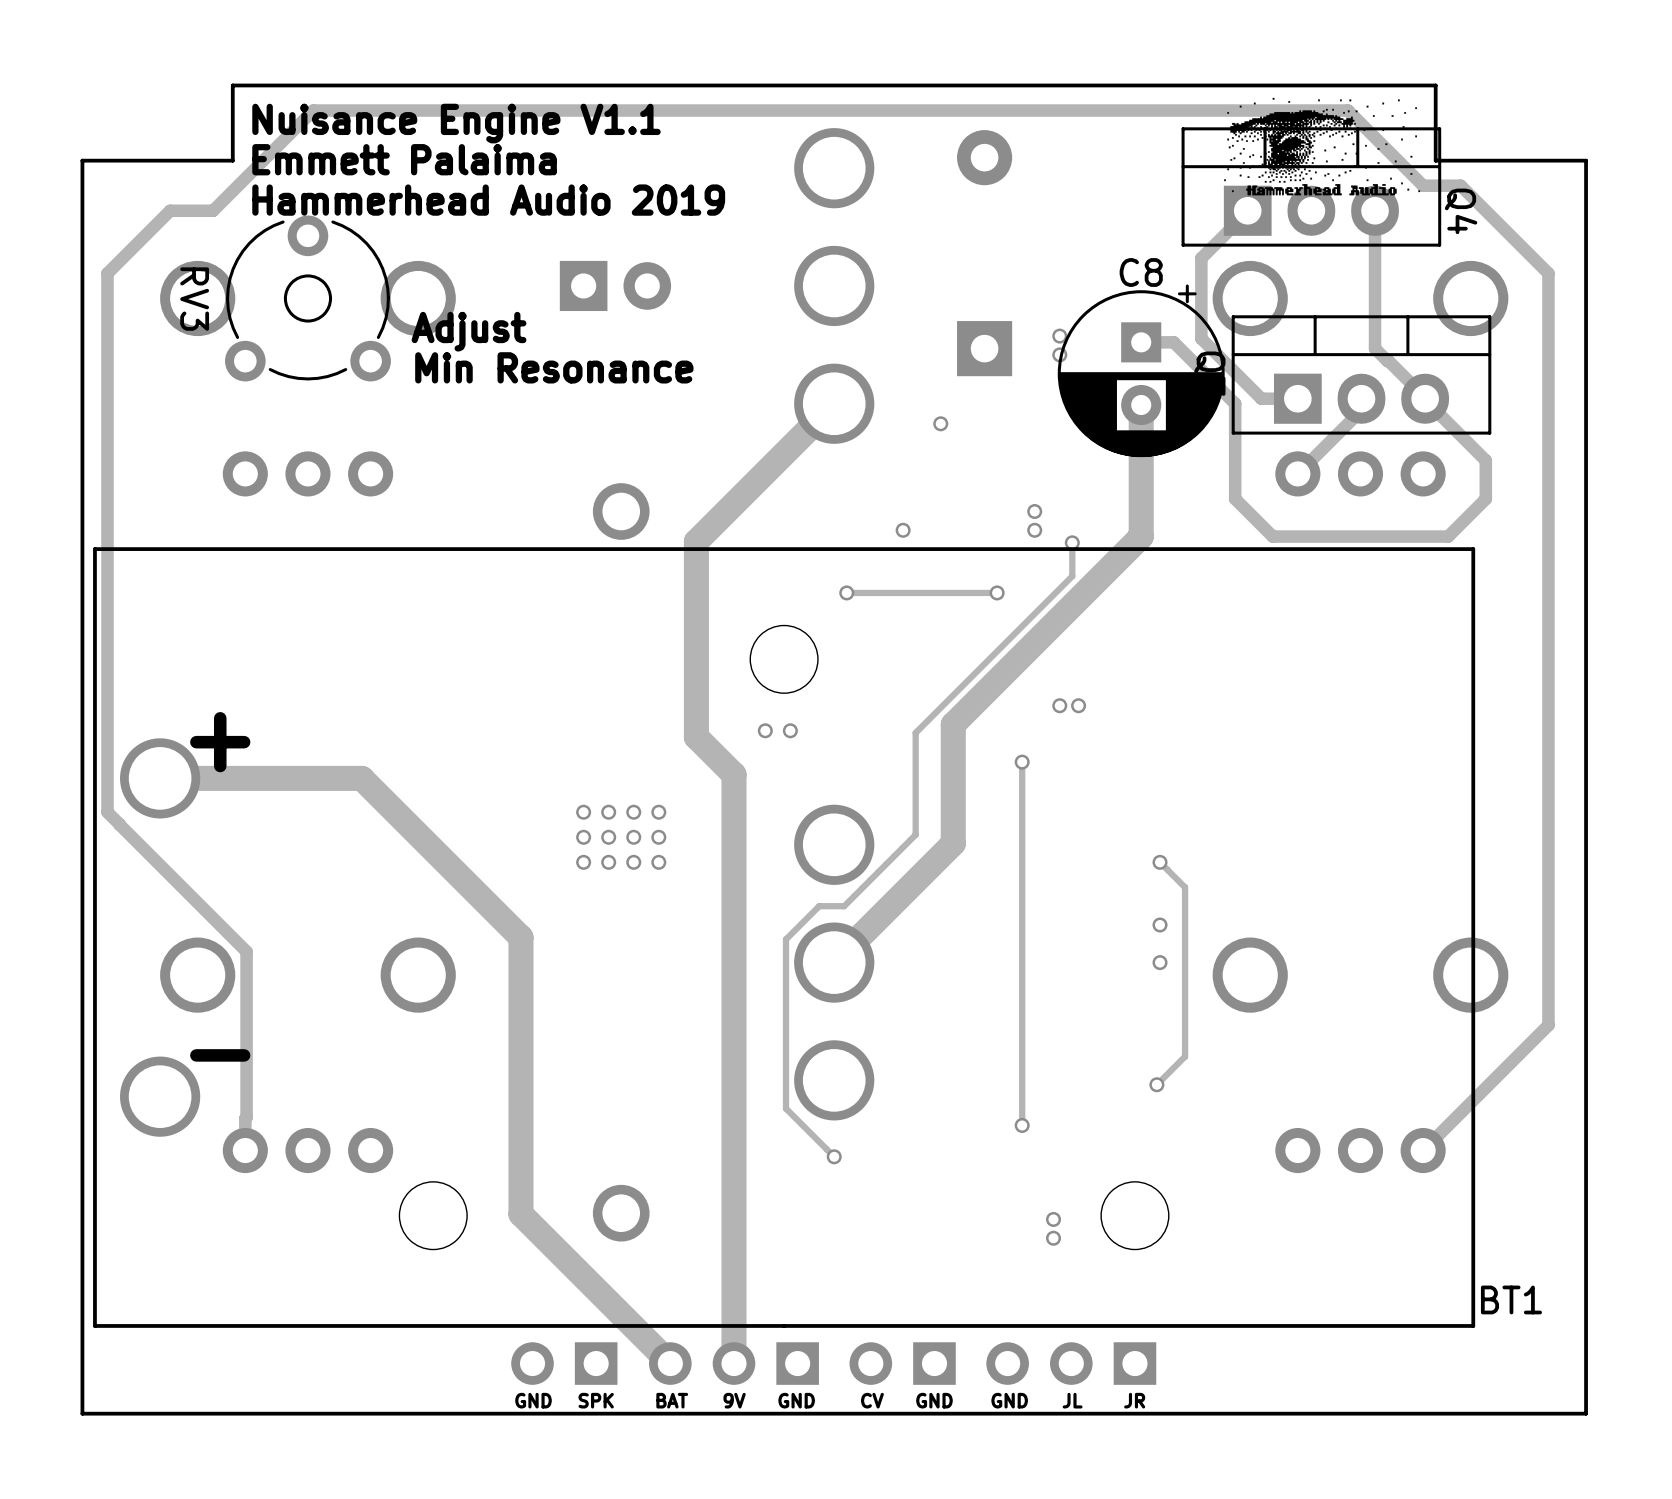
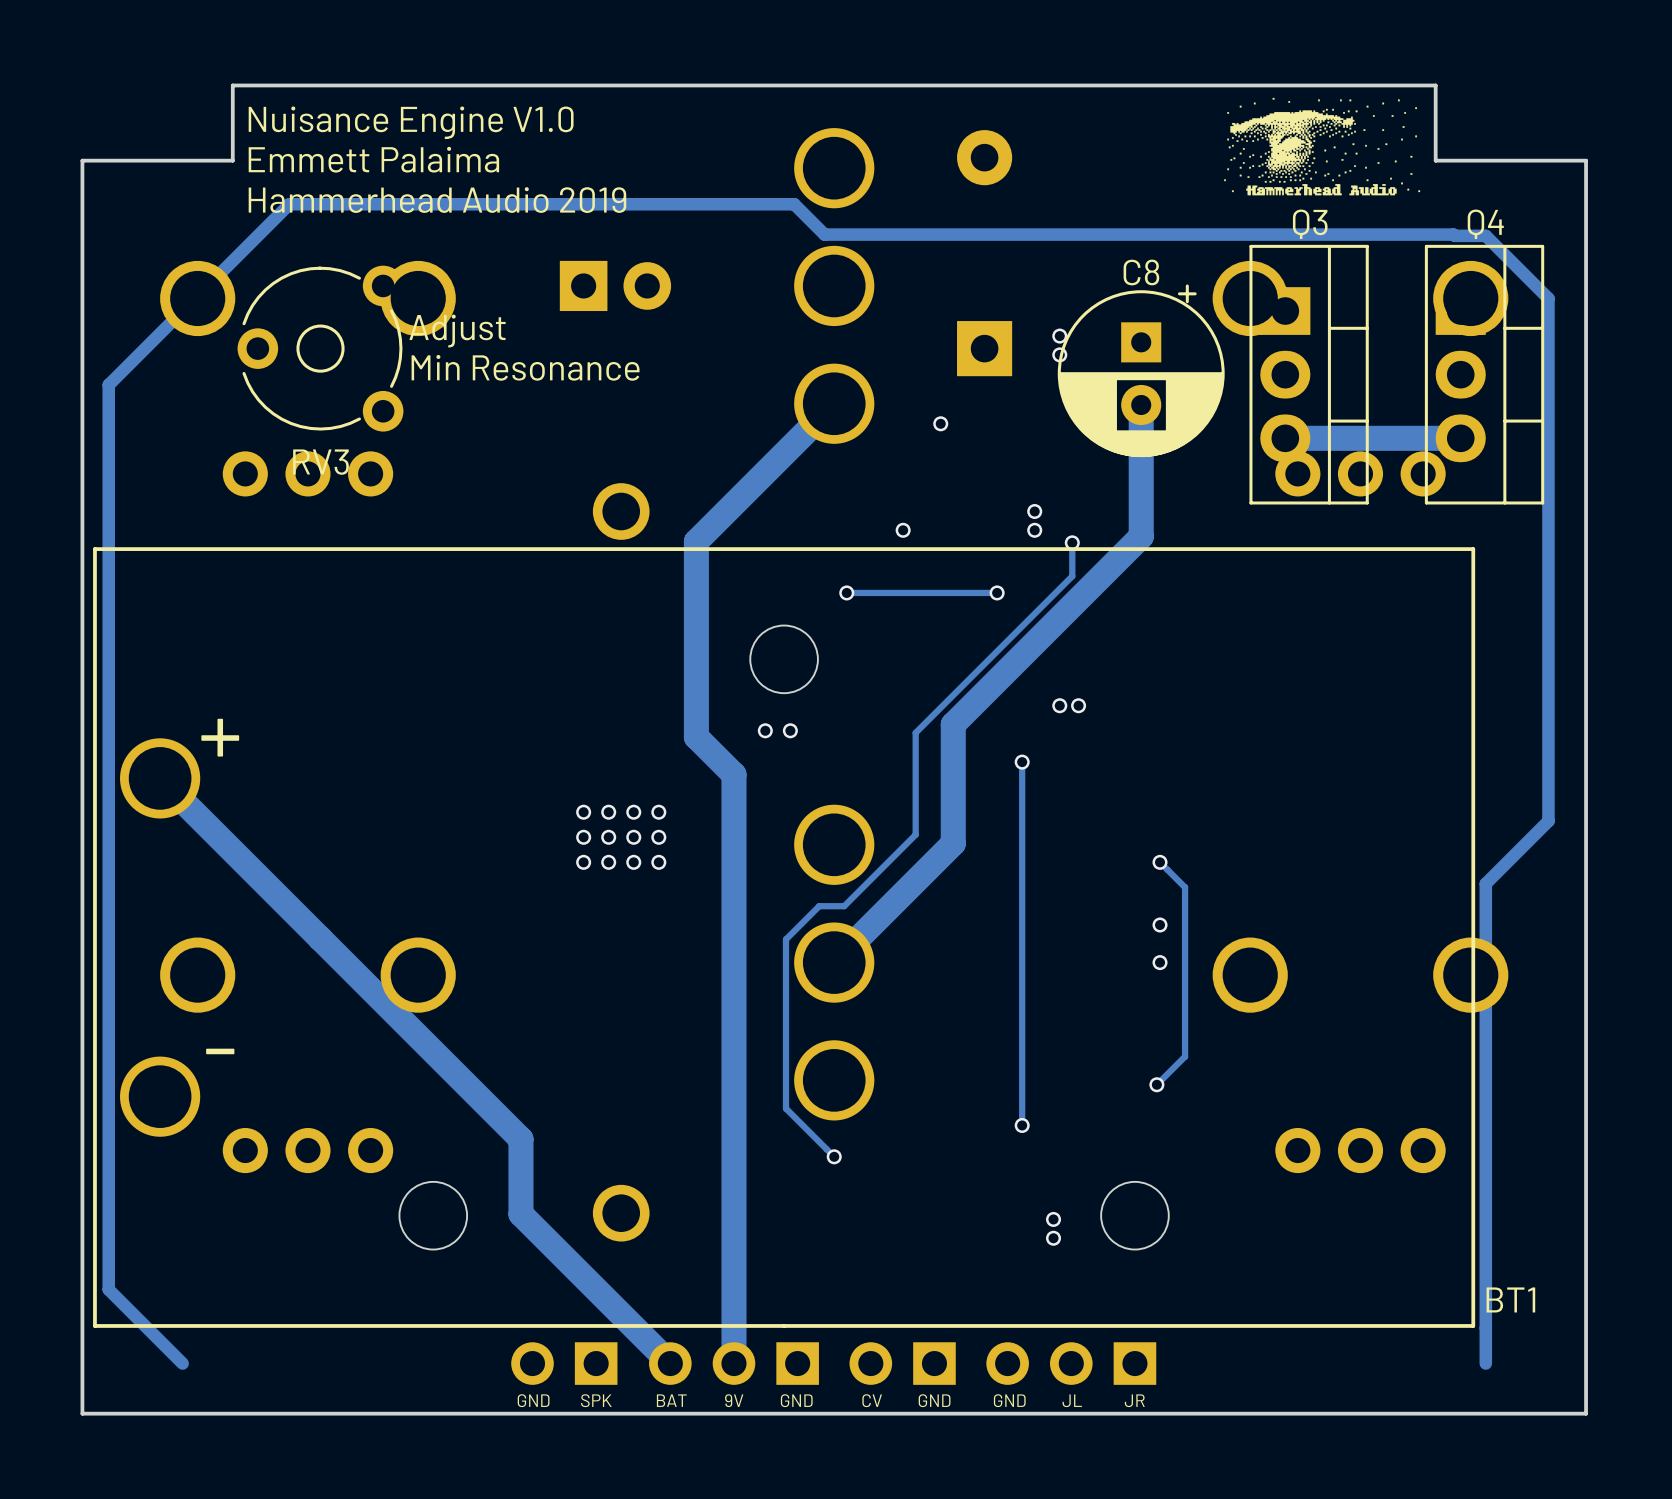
text: Nuisance Engine V1.1 (456, 123) -> Nuisance Engine V1.0 (411, 122)
Q4 rotation: 0° (1311, 186) -> 90° clockwise (1484, 374)
Q4 position: (1311, 186) -> (1484, 374)
track: (1247, 210) (1201, 258) (1201, 338) (1261, 398) (1297, 398) -> none
track: (1375, 210) (1375, 348) (1485, 460) (1485, 498) (1448, 536) (1272, 536) (1235, 498) (1235, 403) (1173, 342) (1141, 342) -> none
Q4 name position: Q4 (1461, 211) -> Q4 (1485, 224)
RV3 rotation: 0° (307, 298) -> 90° counterclockwise (320, 348)
track: (1548, 298) (1548, 273) (1460, 185) (1423, 185) (1347, 110) (313, 110) (213, 210) (170, 210) (107, 273) (107, 812) (119, 824) -> (1548, 298) (1485, 235) (824, 234) (794, 204) (289, 204) (108, 384) (108, 1289) (182, 1363)
Q3 rotation: 0° (1361, 374) -> 90° clockwise (1309, 374)
track: (1361, 398) (1361, 410) (1297, 473) -> none
track: none -> (1460, 438) (1285, 438)
track: (160, 778) (361, 778) (520, 937) (520, 1139) -> (160, 778) (520, 1139)
track: (1548, 821) (1548, 1025) (1423, 1150) -> (1548, 821) (1485, 883) (1485, 1363)
track: (119, 824) (246, 951) (245, 1150) -> none

